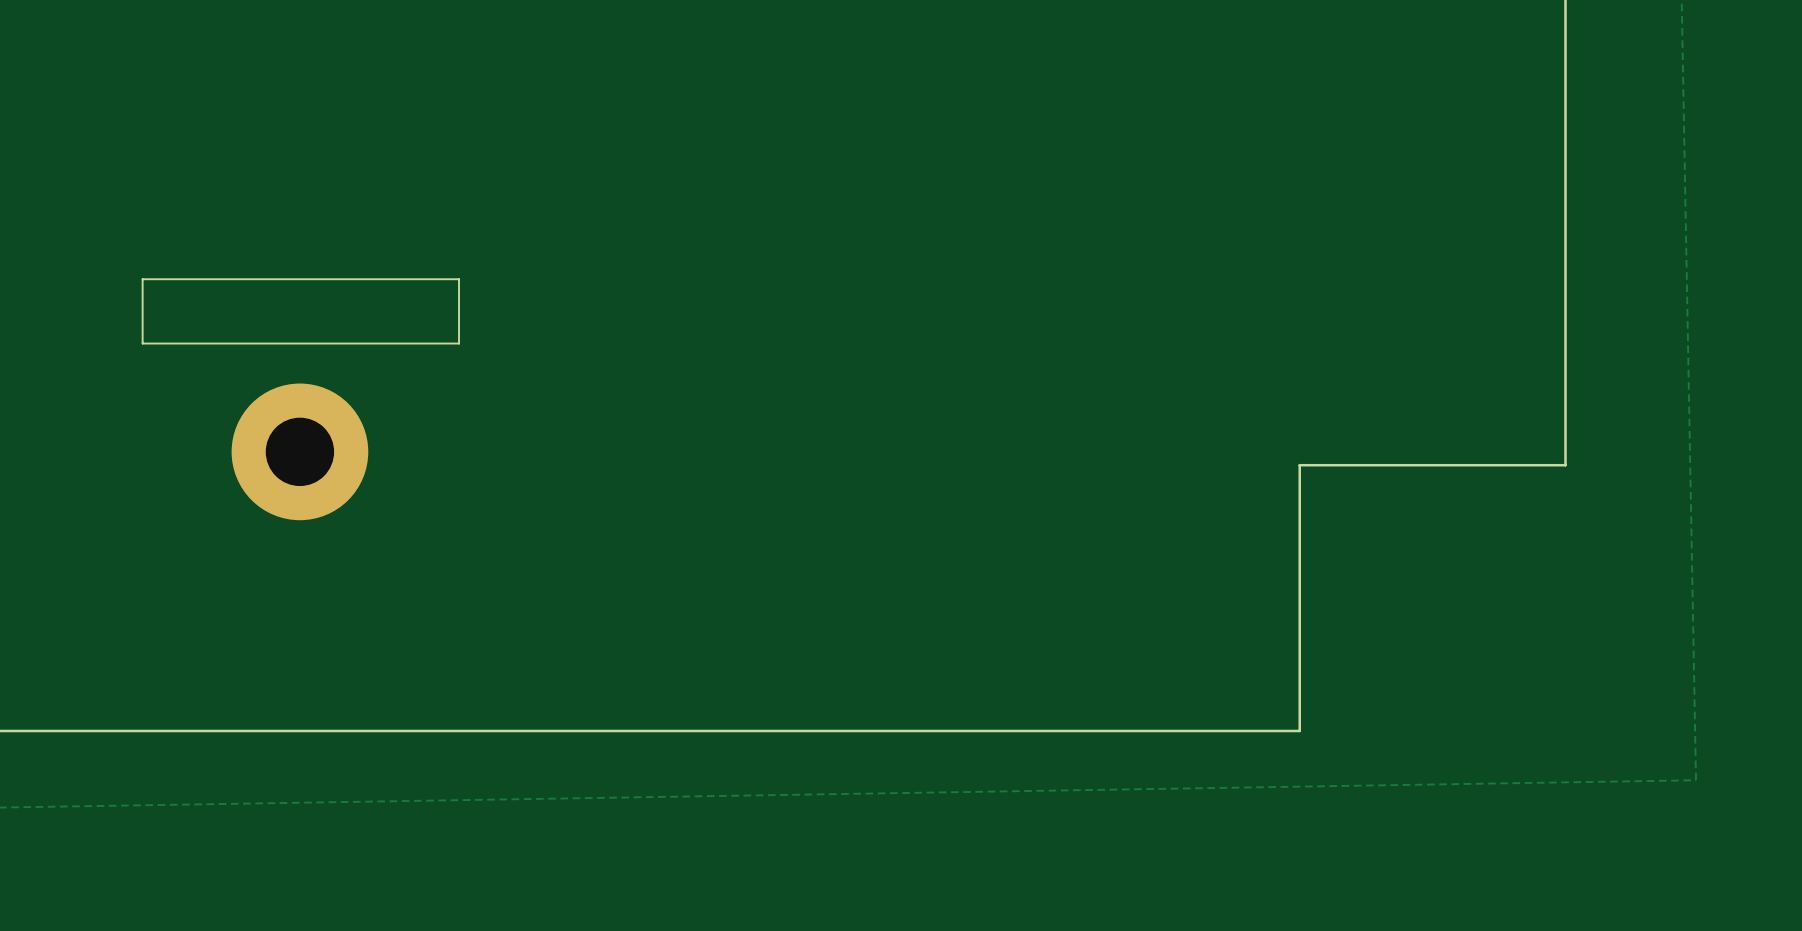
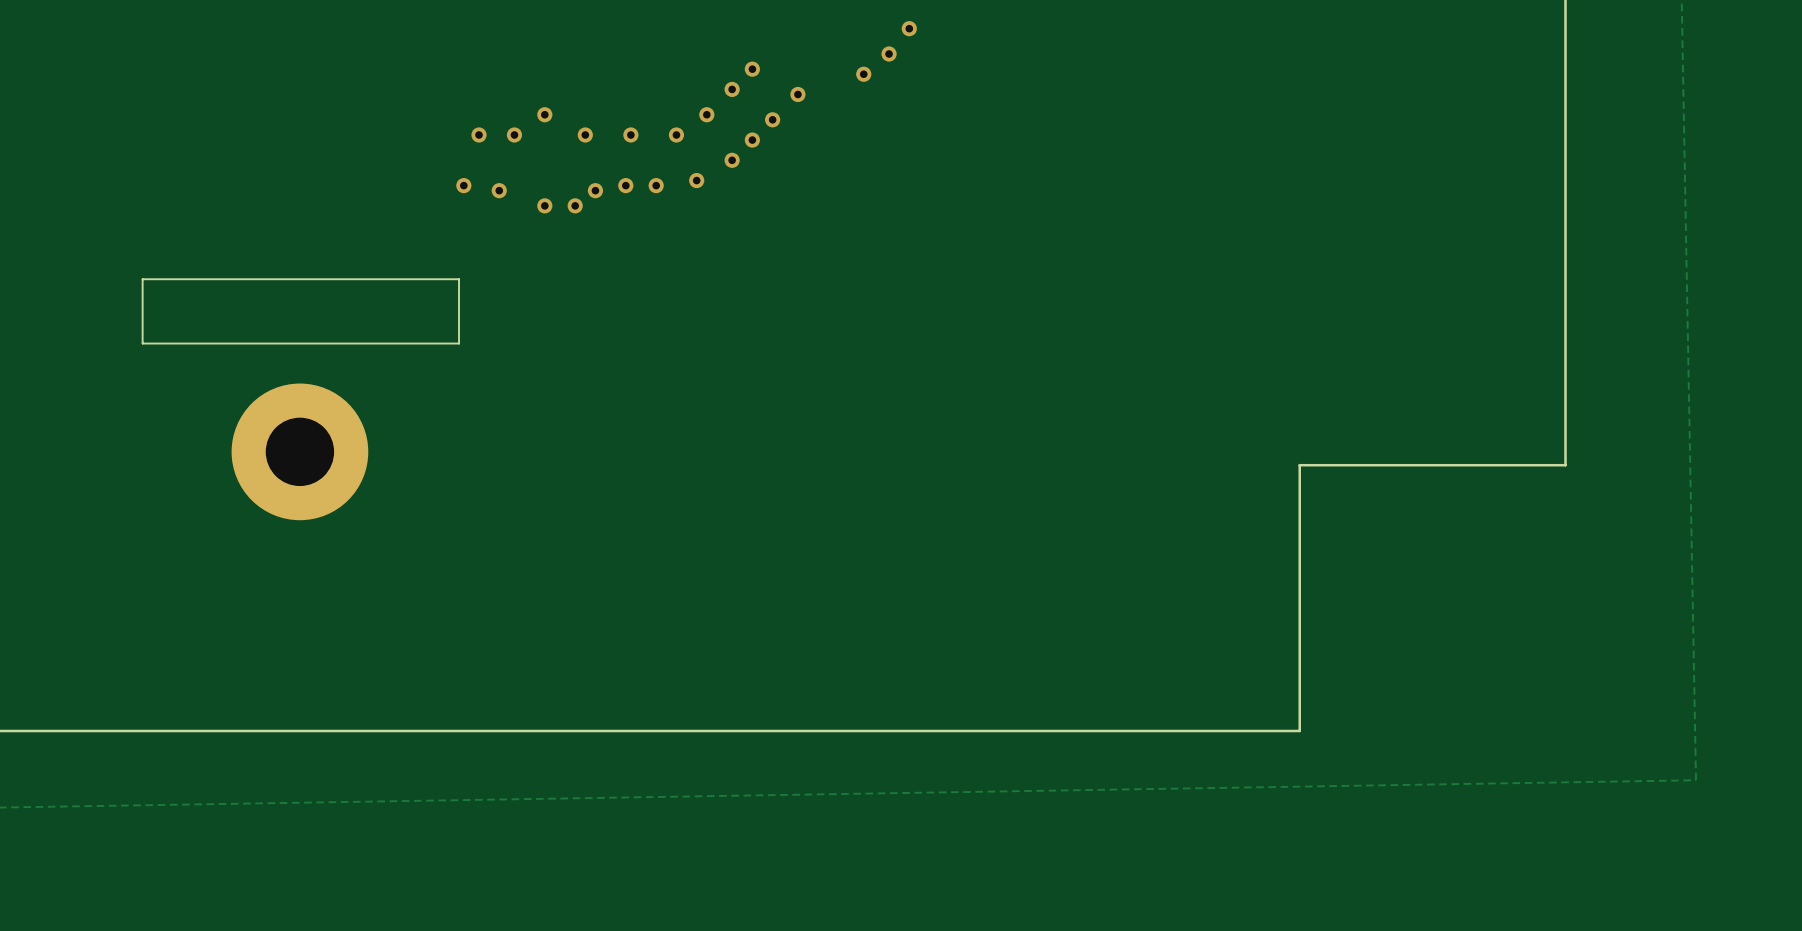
via: none -> (909, 28)
via: none -> (889, 53)
via: none -> (752, 69)
via: none -> (863, 74)
via: none -> (732, 89)
via: none -> (797, 94)
via: none -> (544, 114)
via: none -> (706, 114)
via: none -> (772, 119)
via: none -> (479, 134)
via: none -> (514, 134)
via: none -> (585, 134)
via: none -> (630, 134)
via: none -> (676, 134)
via: none -> (752, 140)
via: none -> (732, 160)
via: none -> (696, 180)
via: none -> (463, 185)
via: none -> (625, 185)
via: none -> (656, 185)
via: none -> (499, 190)
via: none -> (595, 190)
via: none -> (544, 205)
via: none -> (575, 205)

